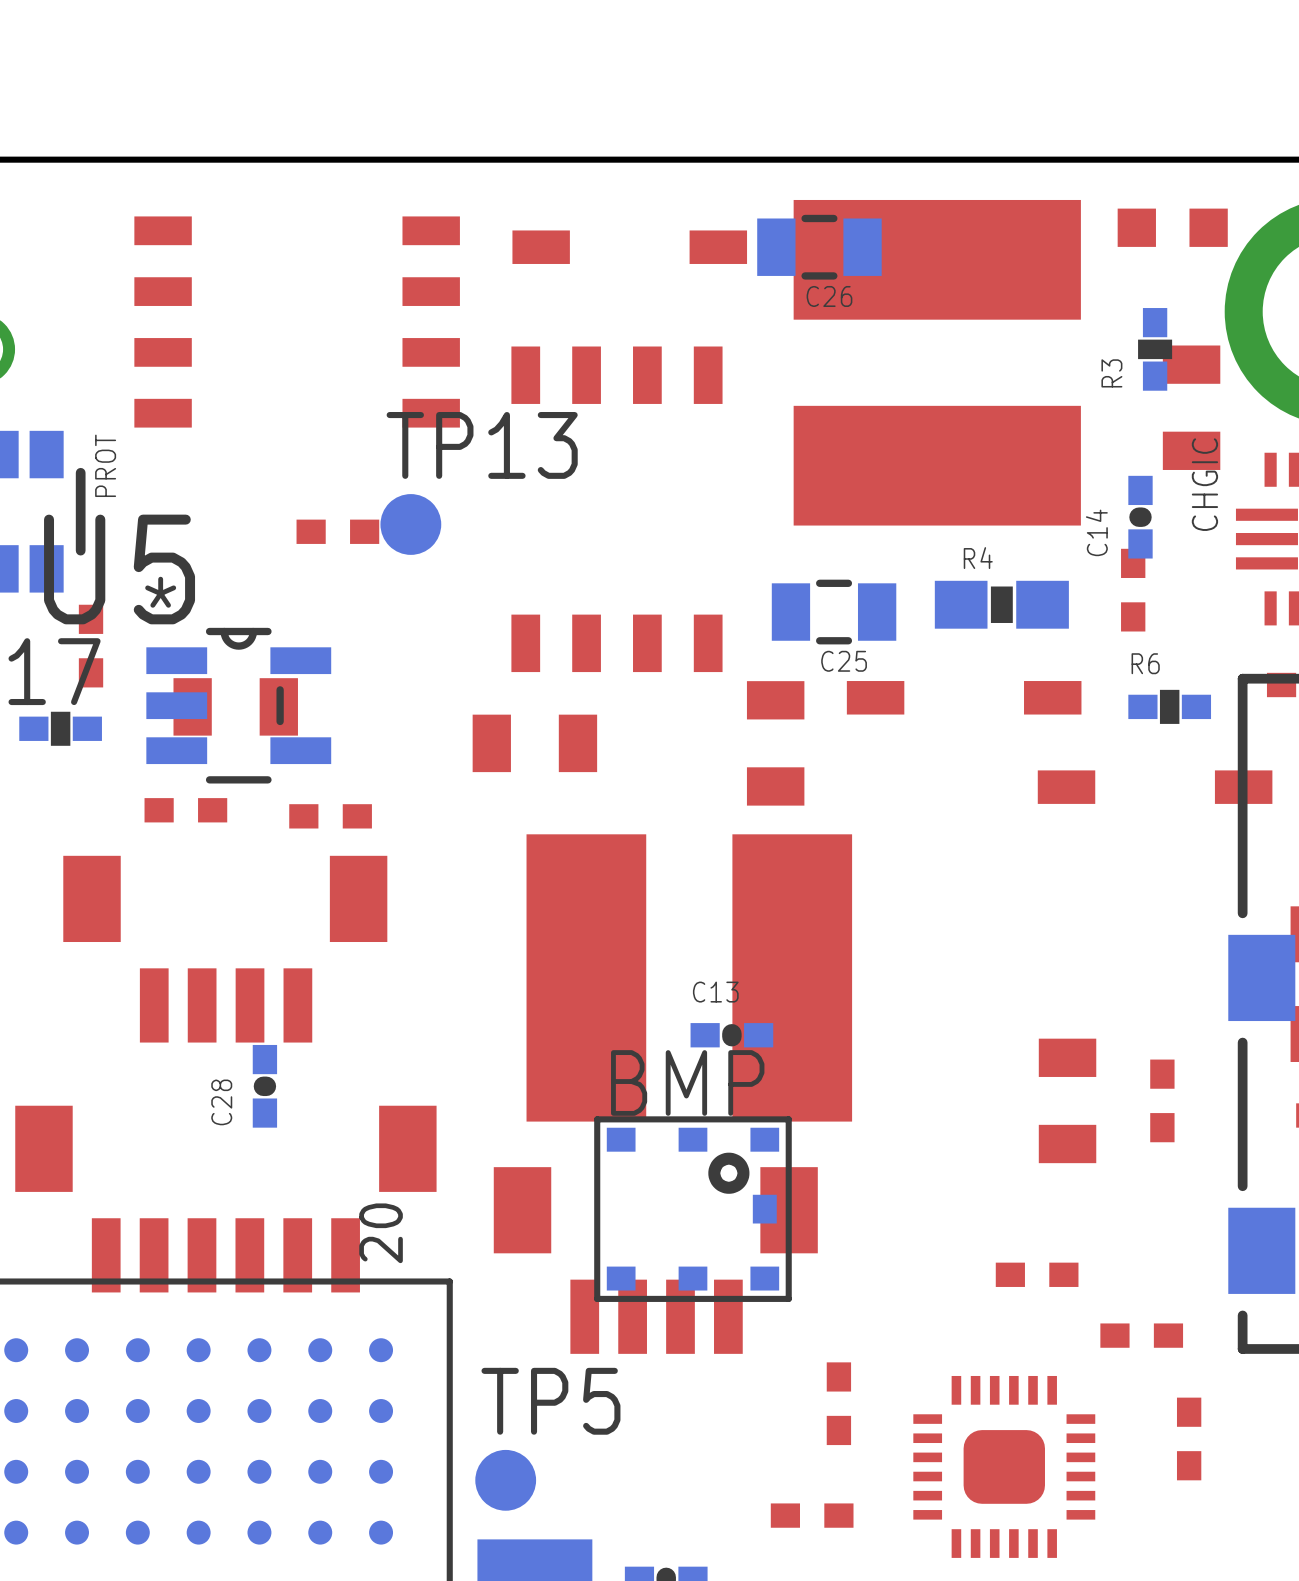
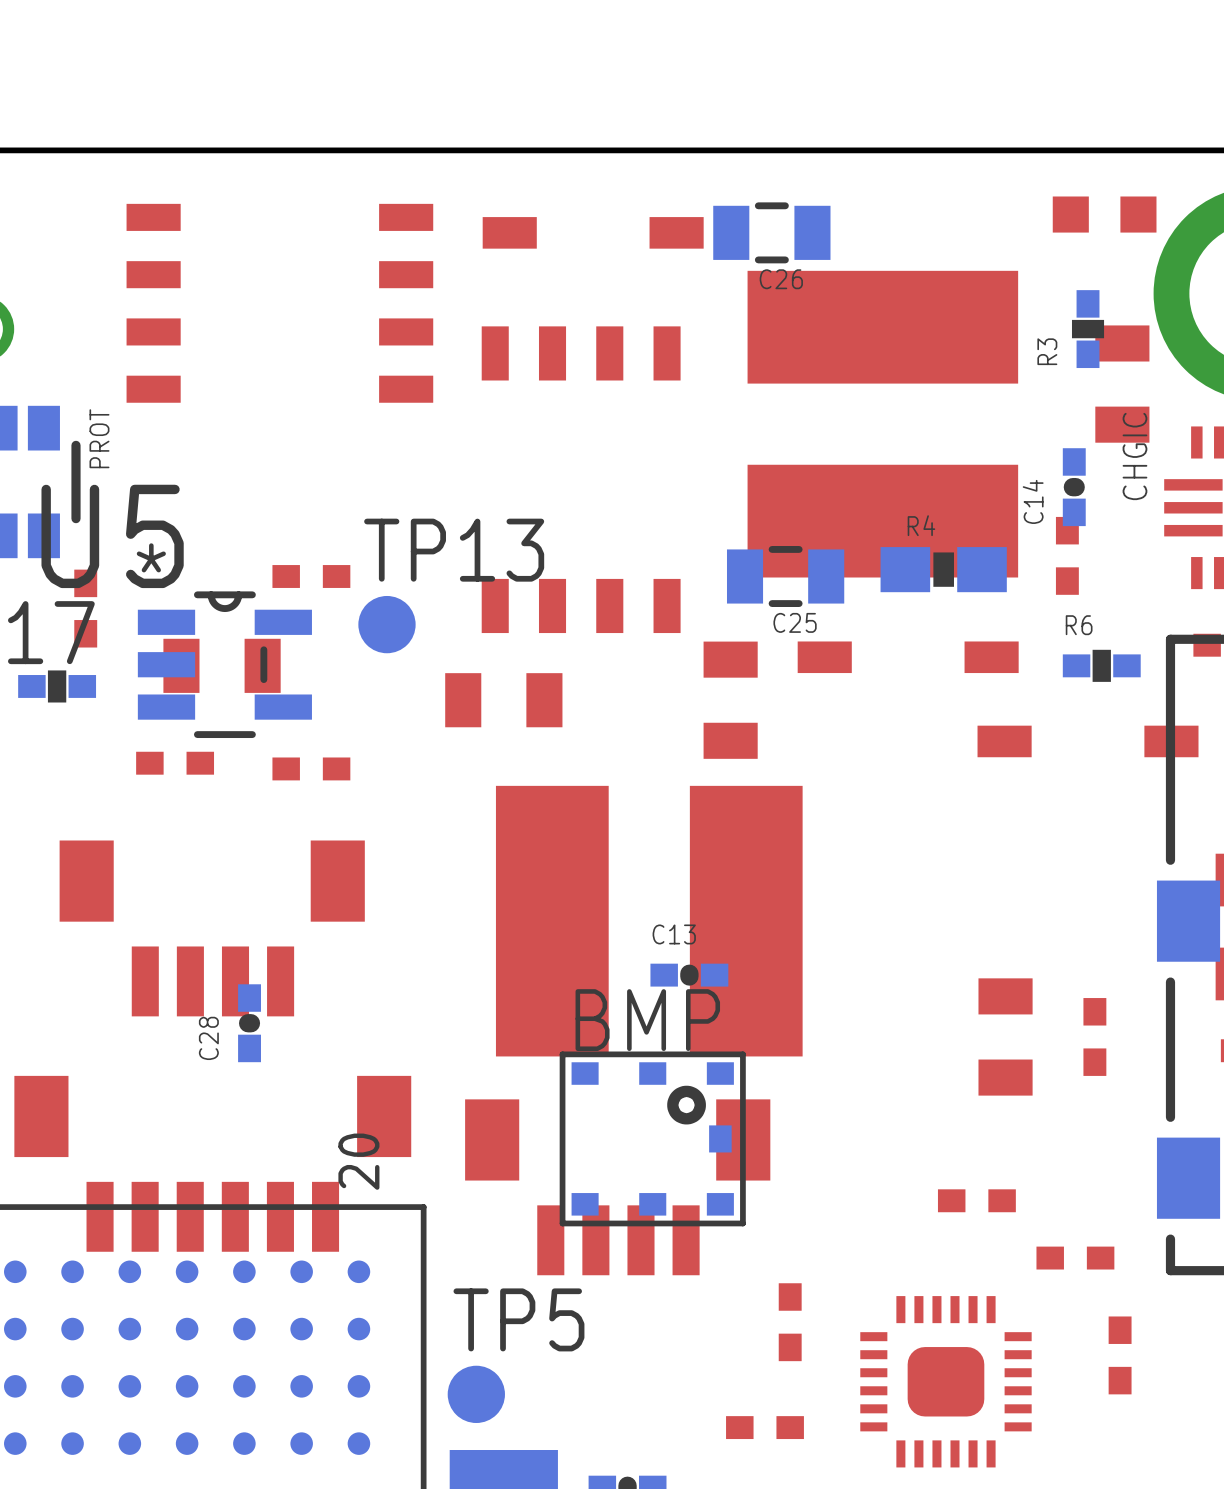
part position: (937, 362) -> (882, 424)
TP13 position: (410, 524) -> (386, 624)
part position: (337, 531) -> (311, 576)
part position: (225, 949) -> (212, 928)
part position: (225, 1199) -> (212, 1163)

